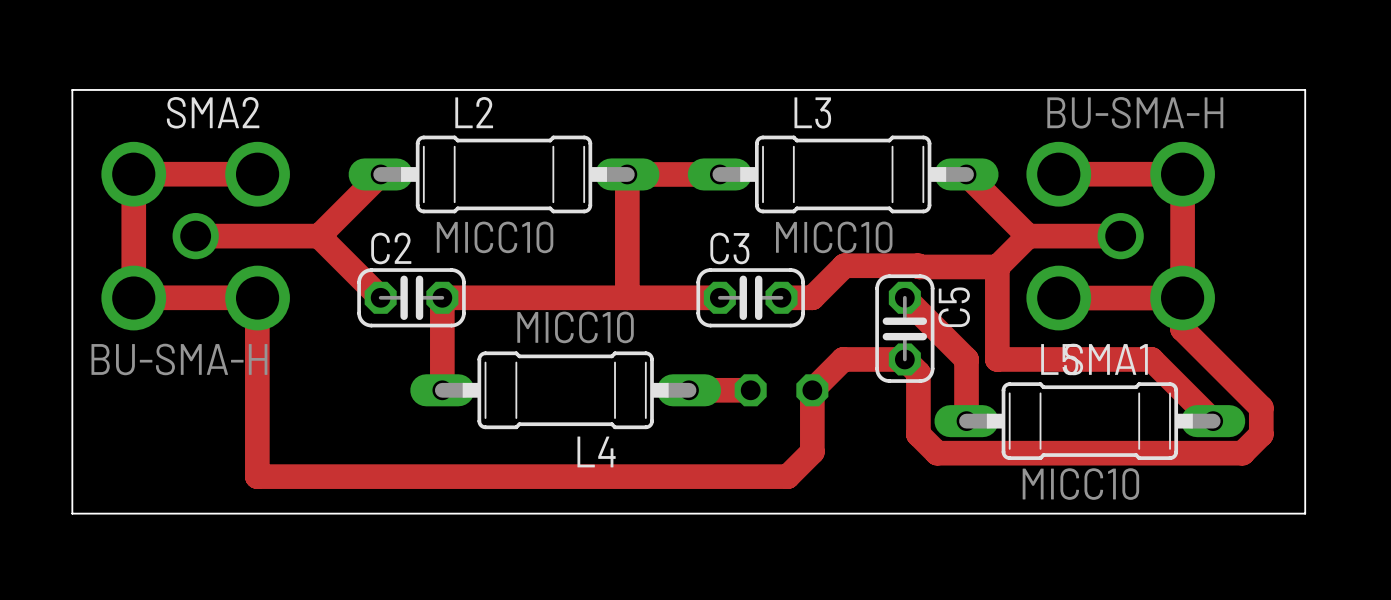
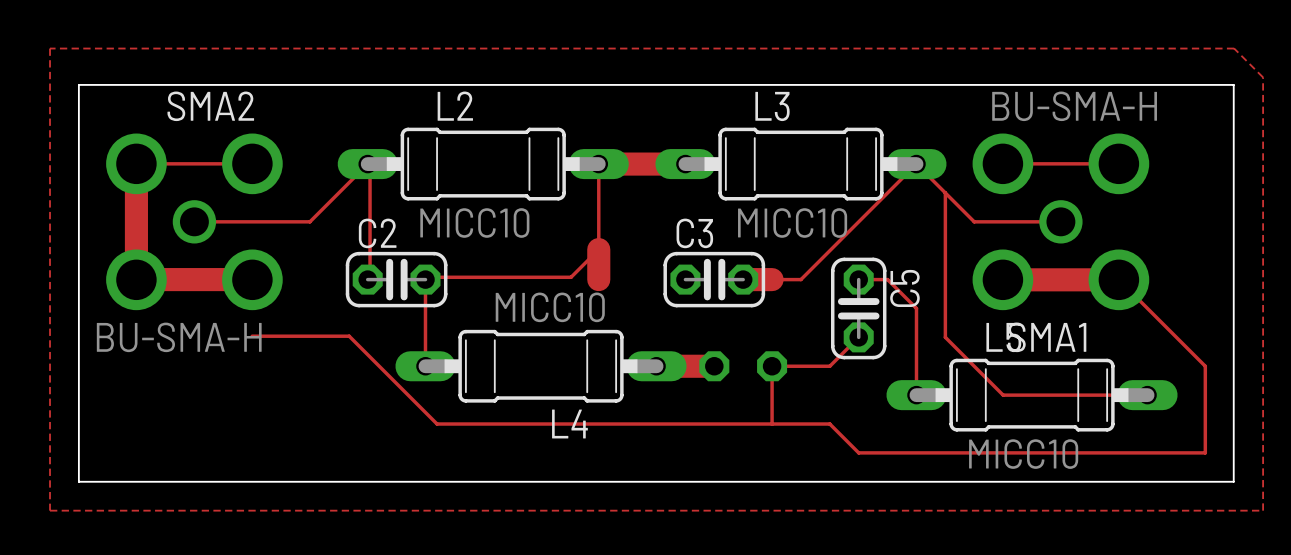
zone outline: none -> (50, 48) (50, 510) (1263, 510) (1263, 77) (1234, 48) (50, 48)
track width: thick (257, 174) (137, 174) (135, 176) -> thin (252, 163) (140, 163) (138, 165)
track width: thick (380, 174) (319, 236) (195, 236) -> thin (367, 164) (309, 221) (194, 221)
track width: thick (627, 174) (627, 265) -> thin (598, 164) (598, 249)
track width: thick (966, 174) (1028, 236) (1120, 236) -> thin (916, 164) (974, 221) (1060, 221)
track width: thick (1058, 174) (1182, 174) -> thin (1002, 163) (1118, 163)
track: (1182, 174) (1182, 329) (1261, 407) (1261, 434) (1242, 453) (937, 453) (918, 434) (918, 373) (904, 359) (843, 359) (812, 390) -> (858, 337) (829, 366) (772, 366)
track: none -> (945, 192) (945, 250)
track: (319, 236) (380, 297) -> (367, 164) (370, 166) (370, 279) (367, 279)
track: (1028, 236) (997, 266) (844, 265) (812, 297) -> (916, 164) (800, 279) (772, 279)
track width: thick (997, 266) (997, 359) -> thin (945, 250) (945, 337)
track: (442, 297) (719, 297) -> (425, 279) (425, 277) (571, 277) (598, 250)
track width: thick (442, 297) (442, 390) -> thin (425, 279) (425, 366)
track: (904, 297) (966, 359) -> (858, 279) (887, 279) (916, 308) (916, 337)
track: (257, 298) (257, 476) (787, 476) (812, 451) -> none
track: none -> (1118, 279) (1205, 366) (1205, 452) (858, 452) (829, 424) (437, 424) (349, 336) (252, 336)
track width: thick (966, 359) (966, 421) -> thin (916, 337) (916, 395)
track: (997, 359) (1151, 359) (1213, 421) -> (945, 337) (1003, 395) (1147, 395)
track width: thick (812, 390) (812, 451) -> thin (772, 366) (772, 424)

